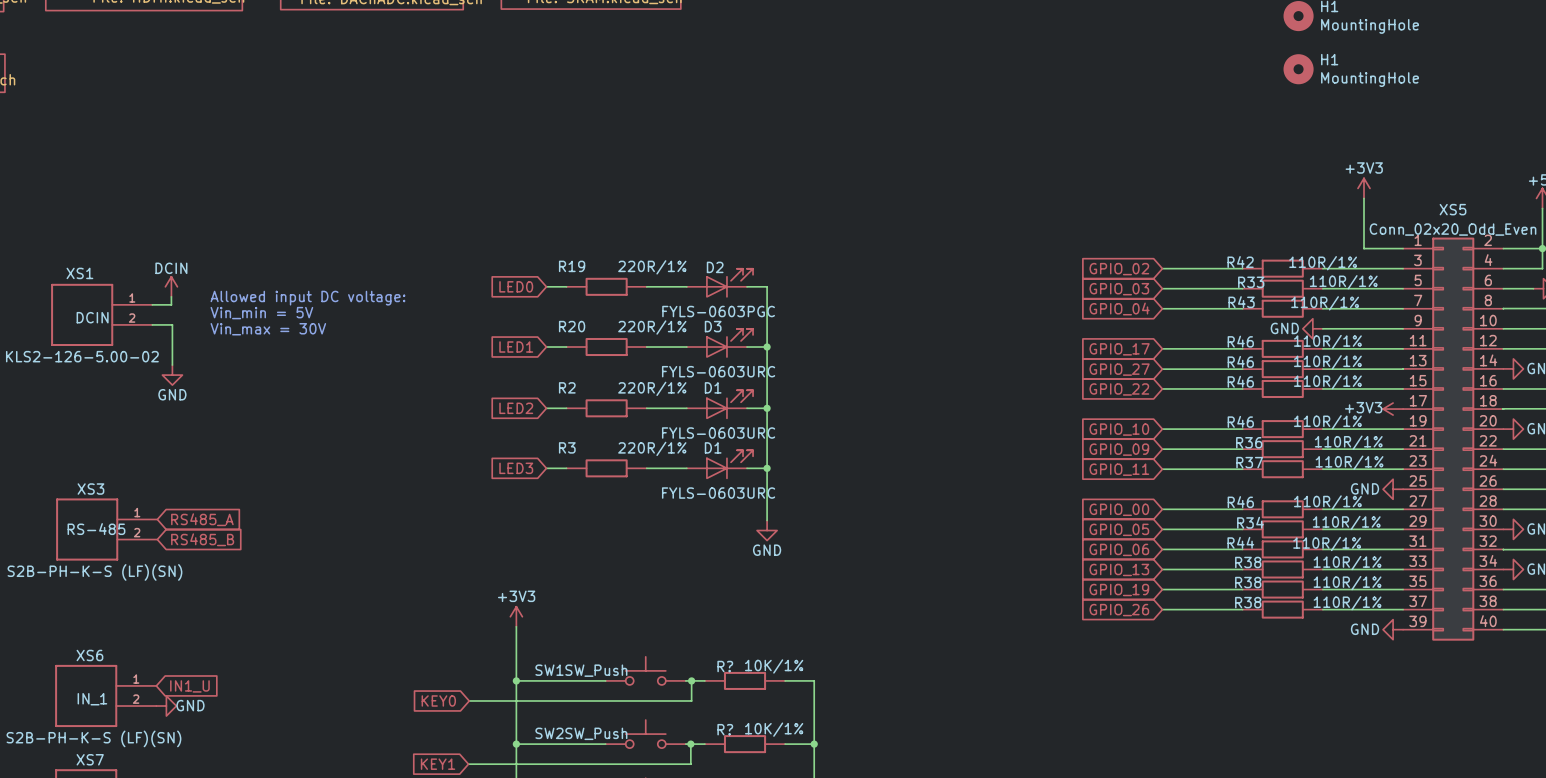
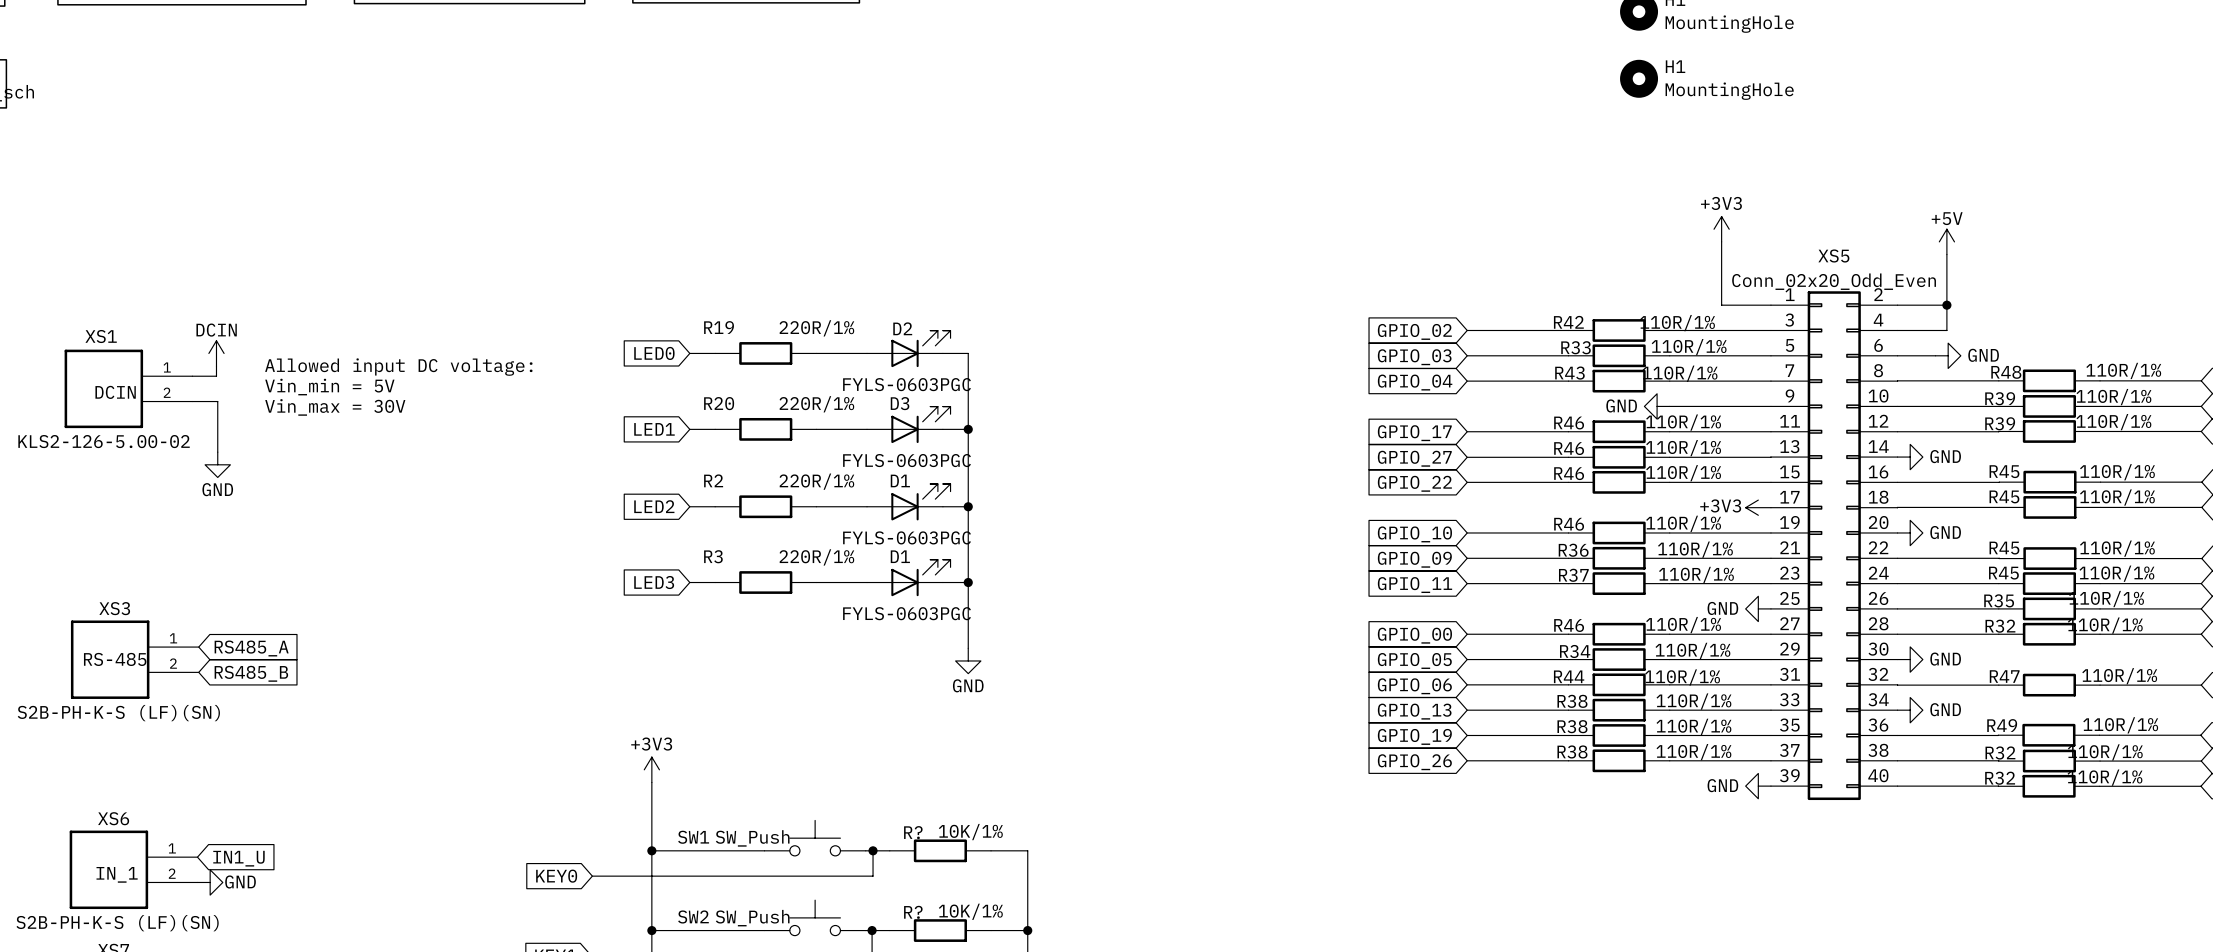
D3 value: FYLS-0603URC (718, 371) -> FYLS-0603PGC (907, 460)
D1 value: FYLS-0603URC (718, 433) -> FYLS-0603PGC (907, 537)
D1 value: FYLS-0603URC (718, 493) -> FYLS-0603PGC (907, 613)

